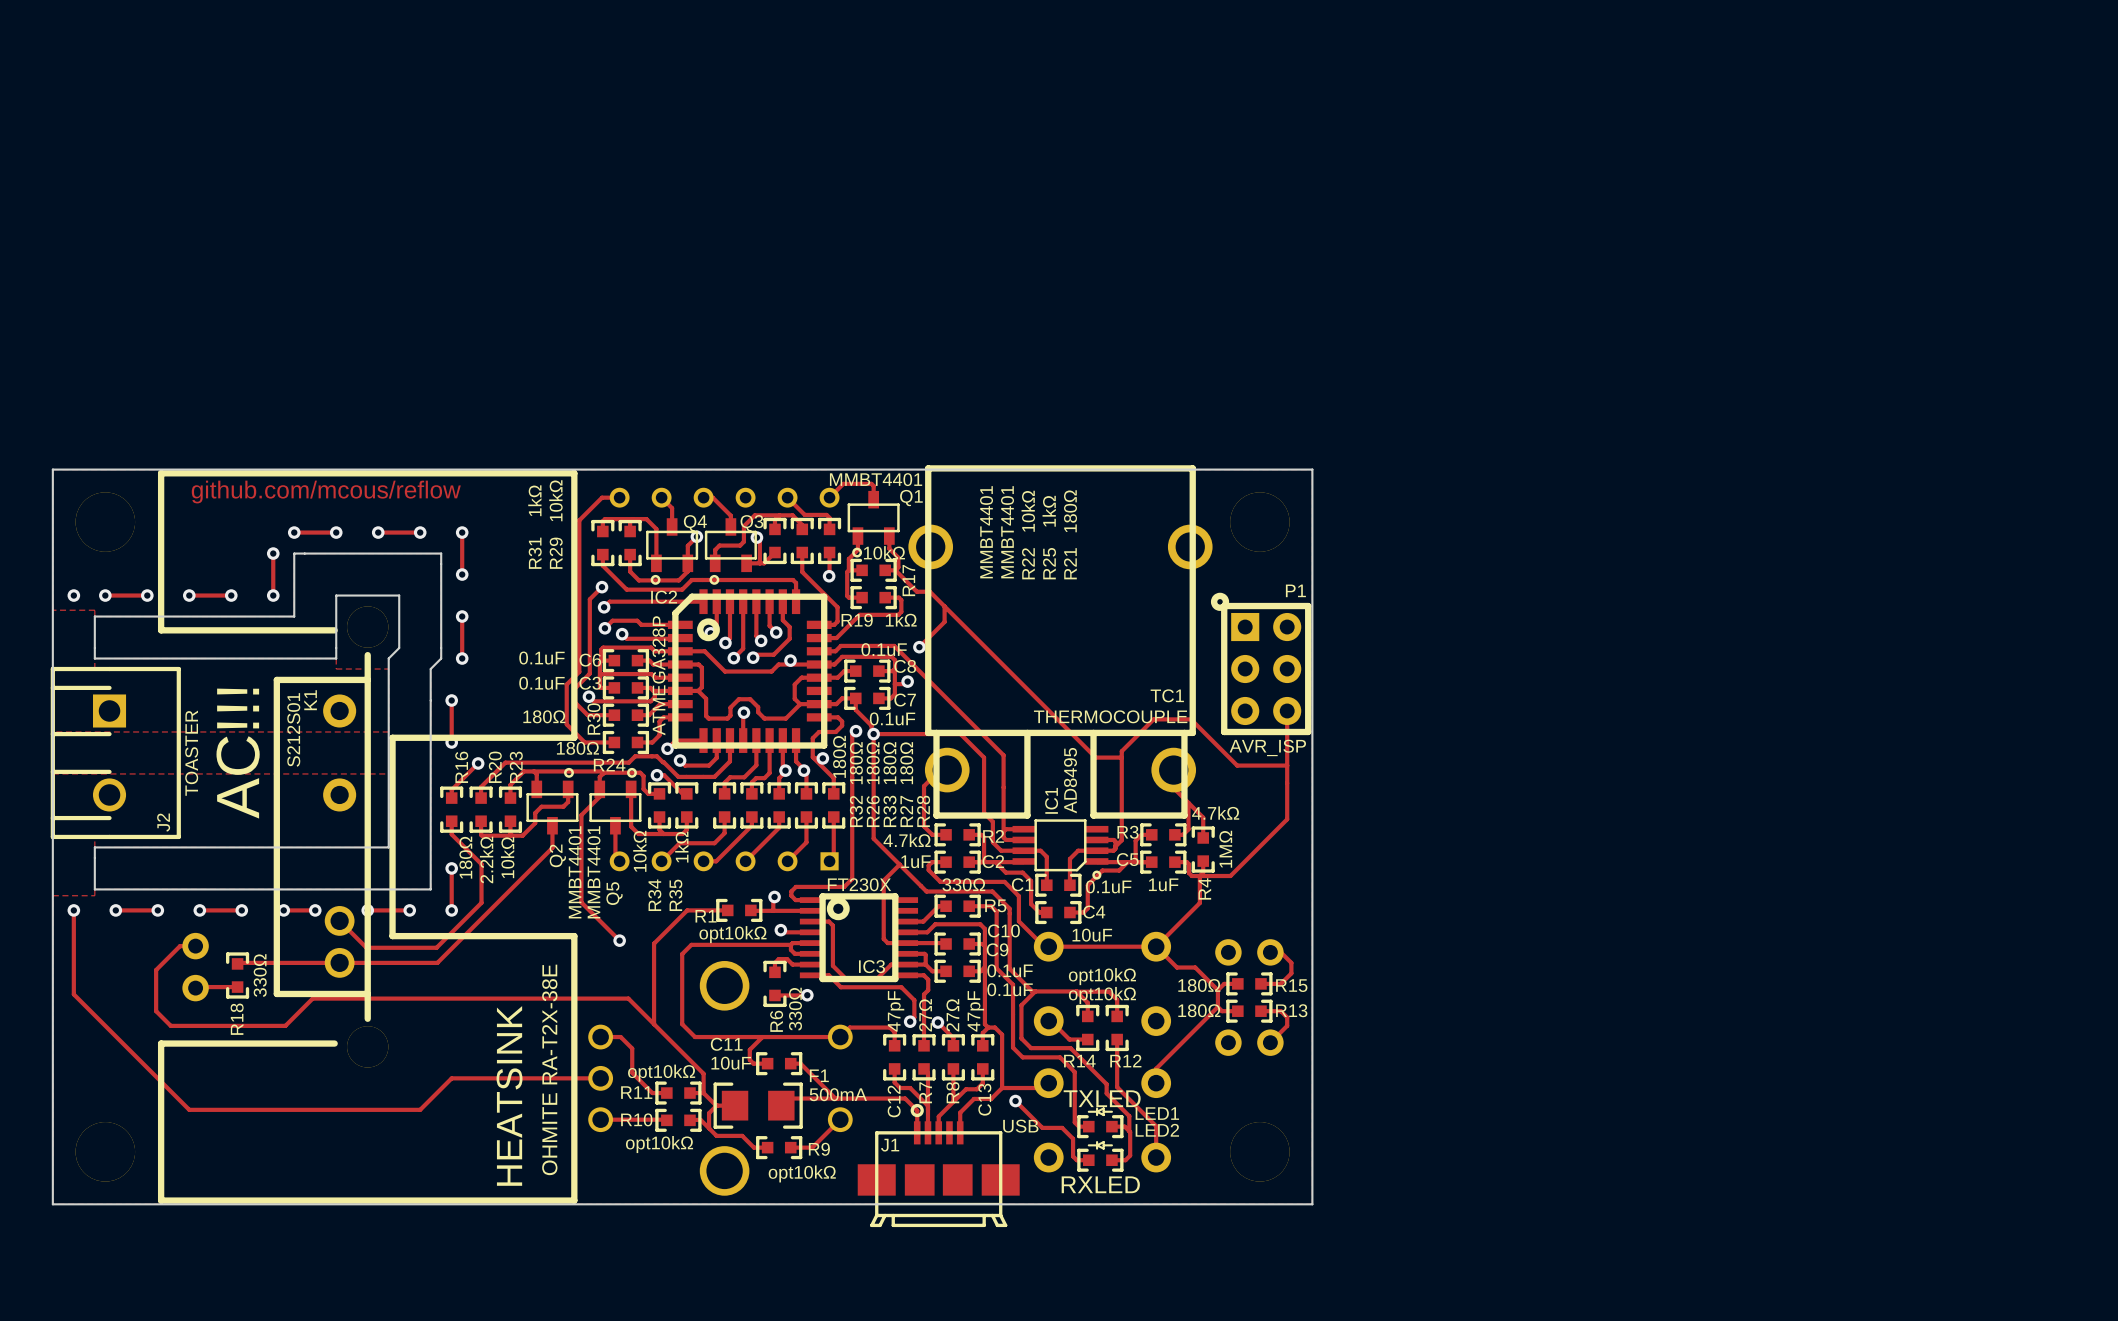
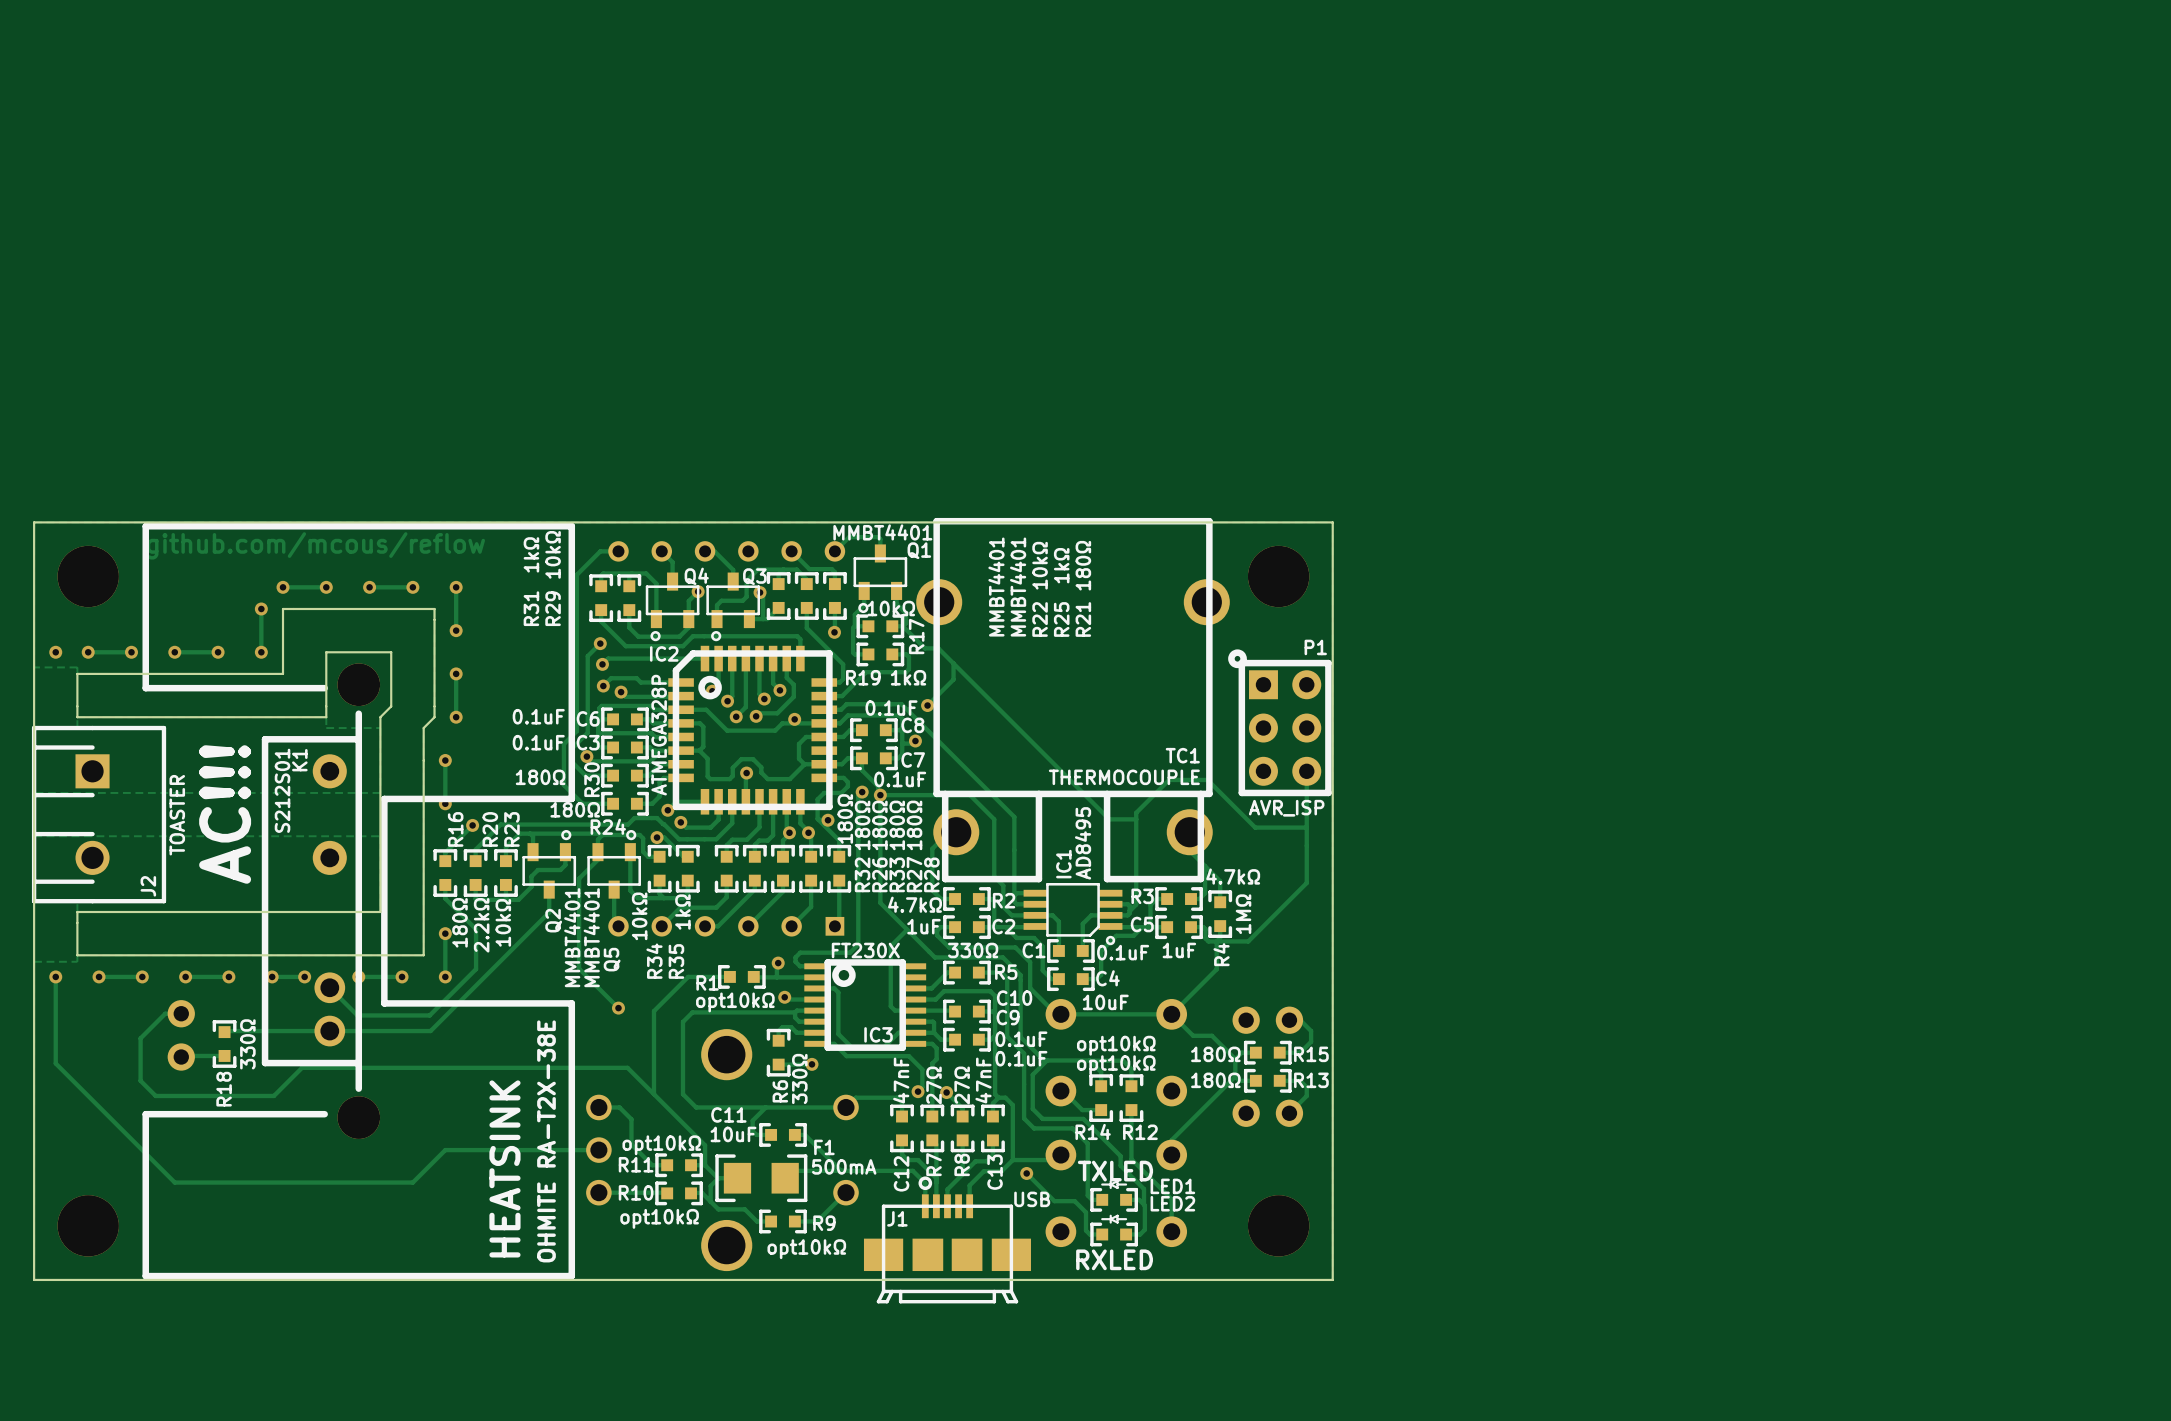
C12 value: 47pF (896, 1011) -> 47nF (901, 1080)
C13 value: 47pF (975, 1011) -> 47nF (983, 1080)

